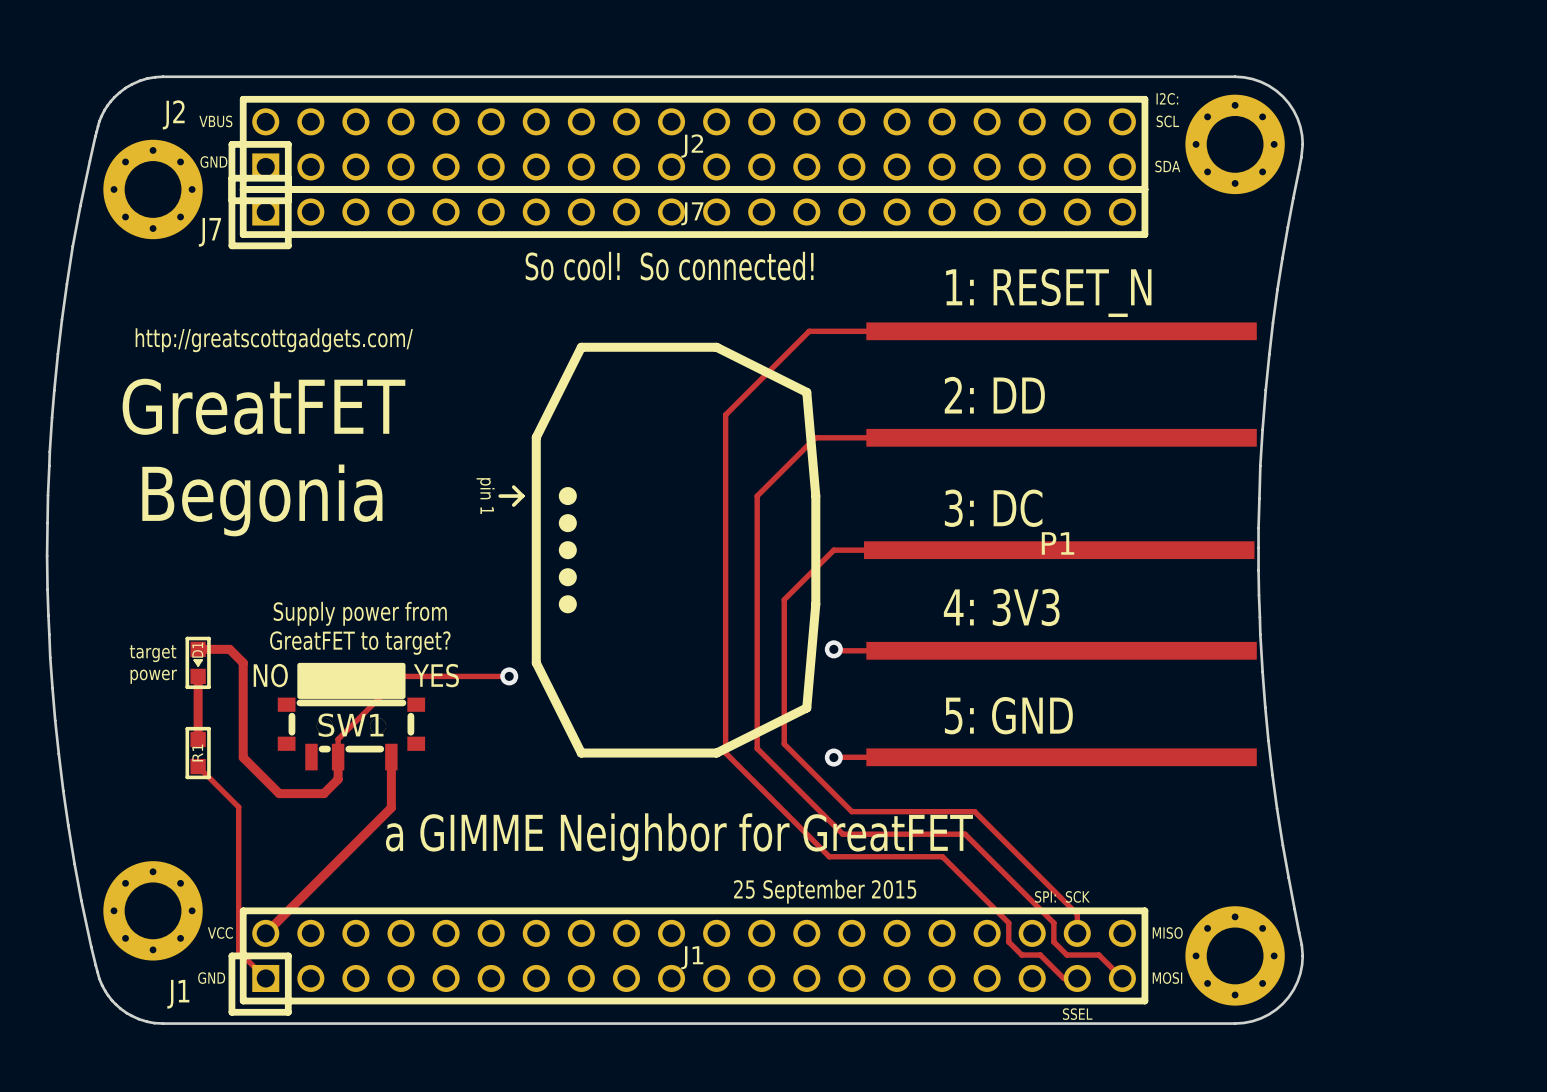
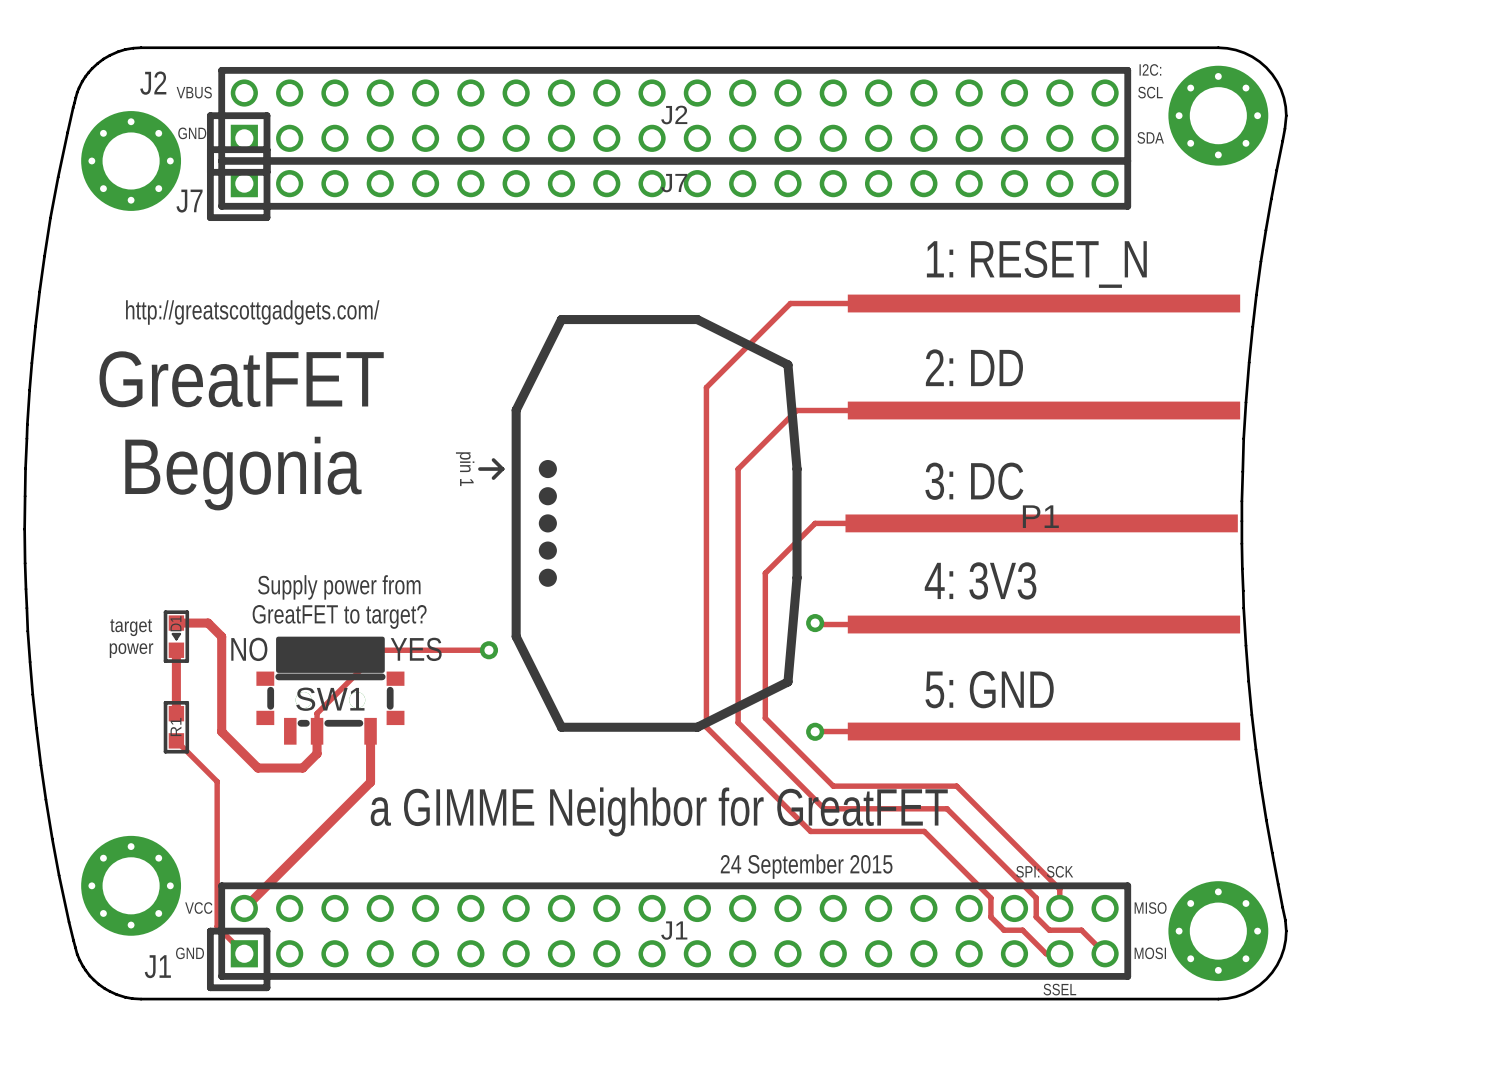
text: So cool! So connected! (669, 266) -> none
text: 25 September 2015 (825, 891) -> 24 September 2015 (806, 866)

